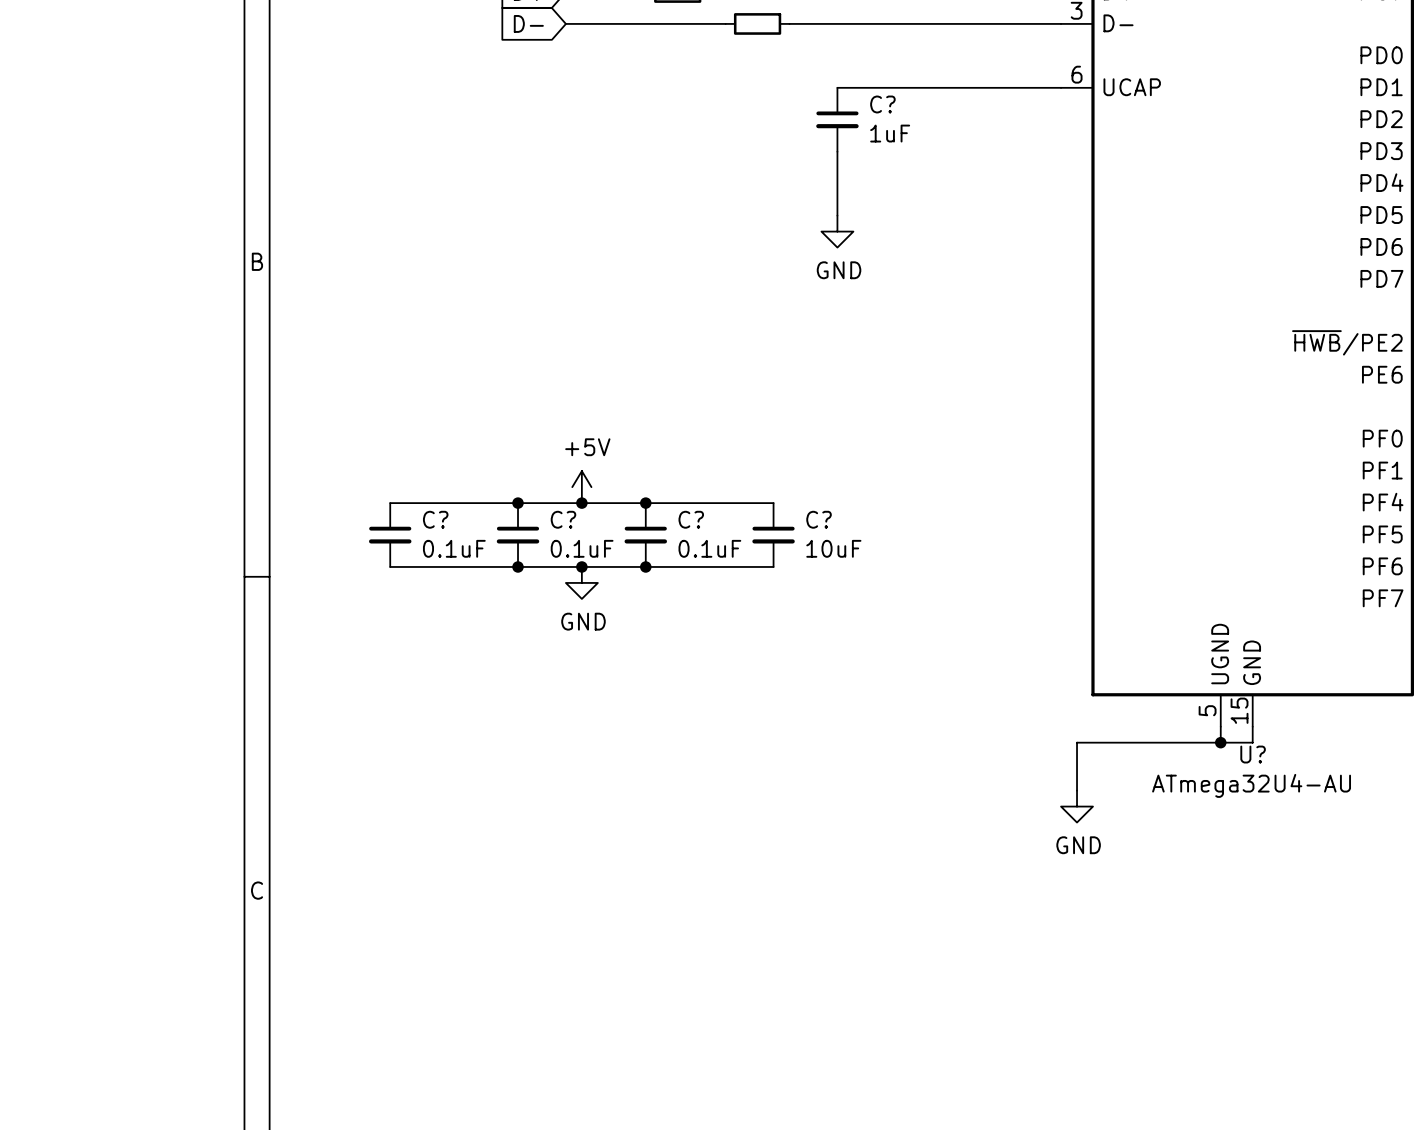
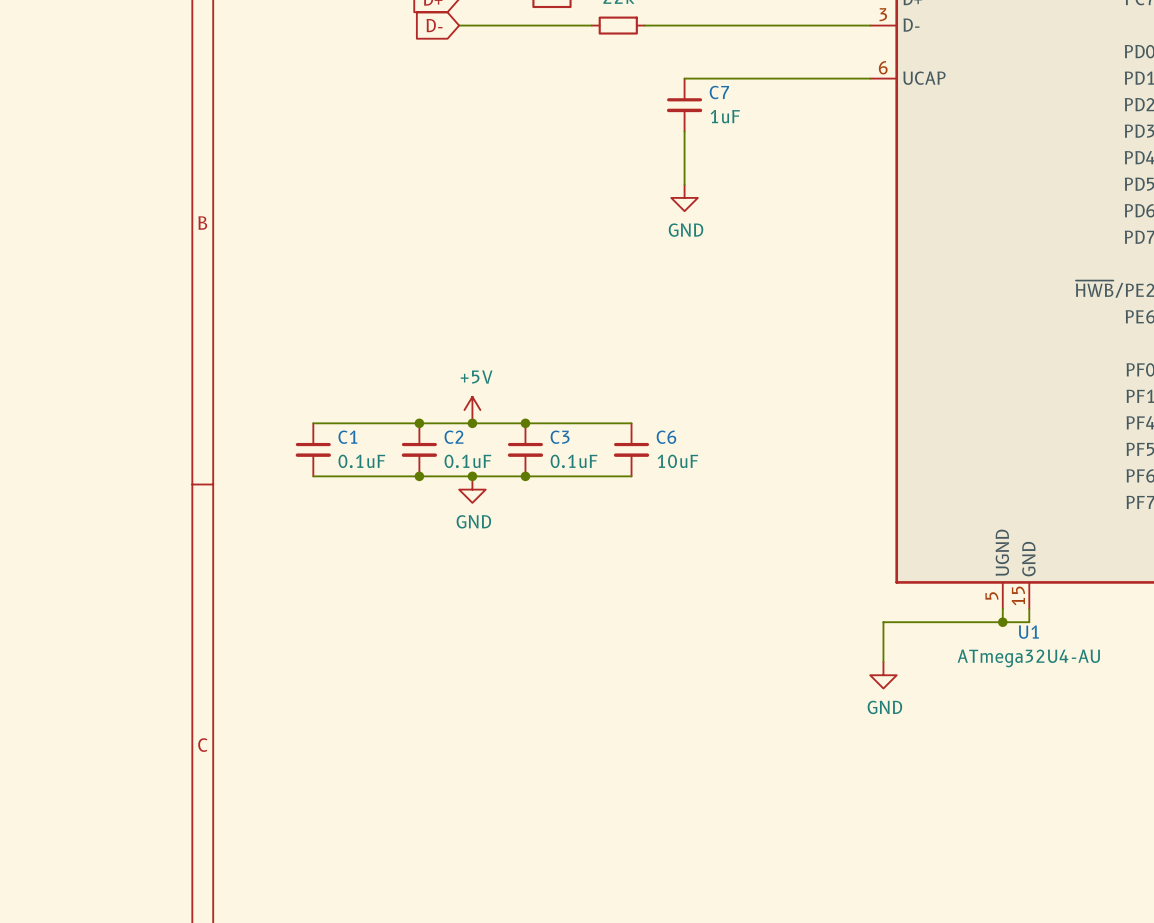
C? name: C? (882, 104) -> C7 (719, 92)
C? name: C? (435, 519) -> C1 (347, 437)
C? name: C? (563, 519) -> C2 (454, 437)
C? name: C? (691, 519) -> C3 (560, 437)
C? name: C? (819, 519) -> C6 (666, 437)
U? name: U? (1253, 754) -> U1 (1028, 632)

